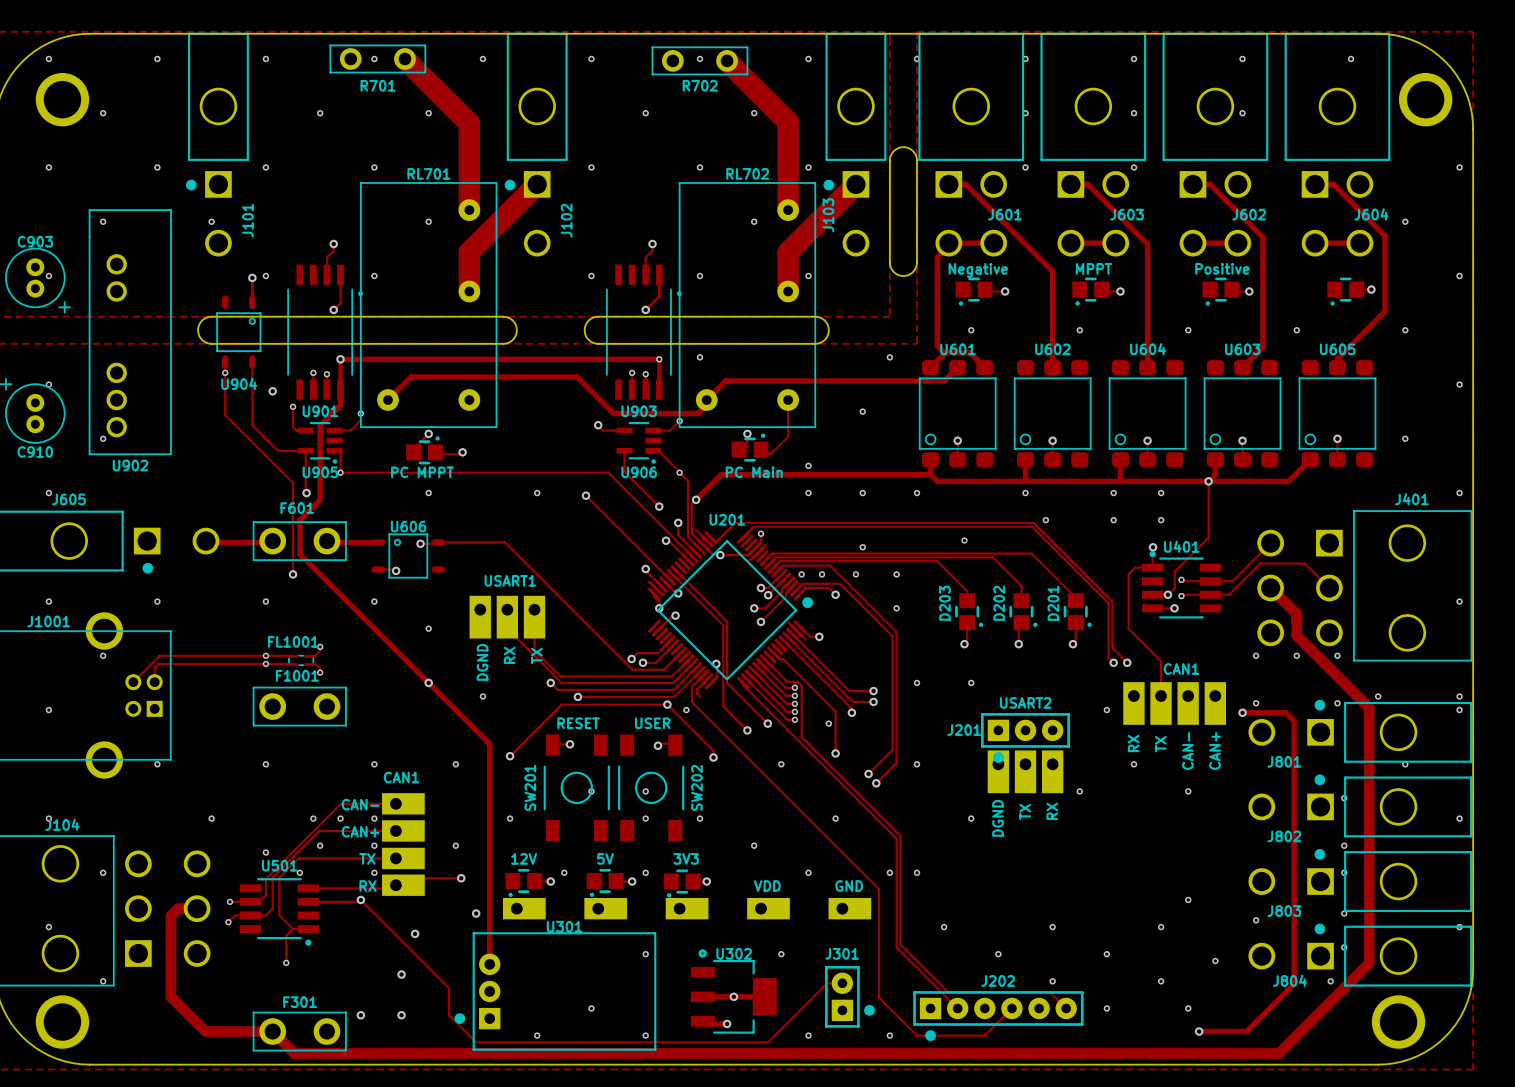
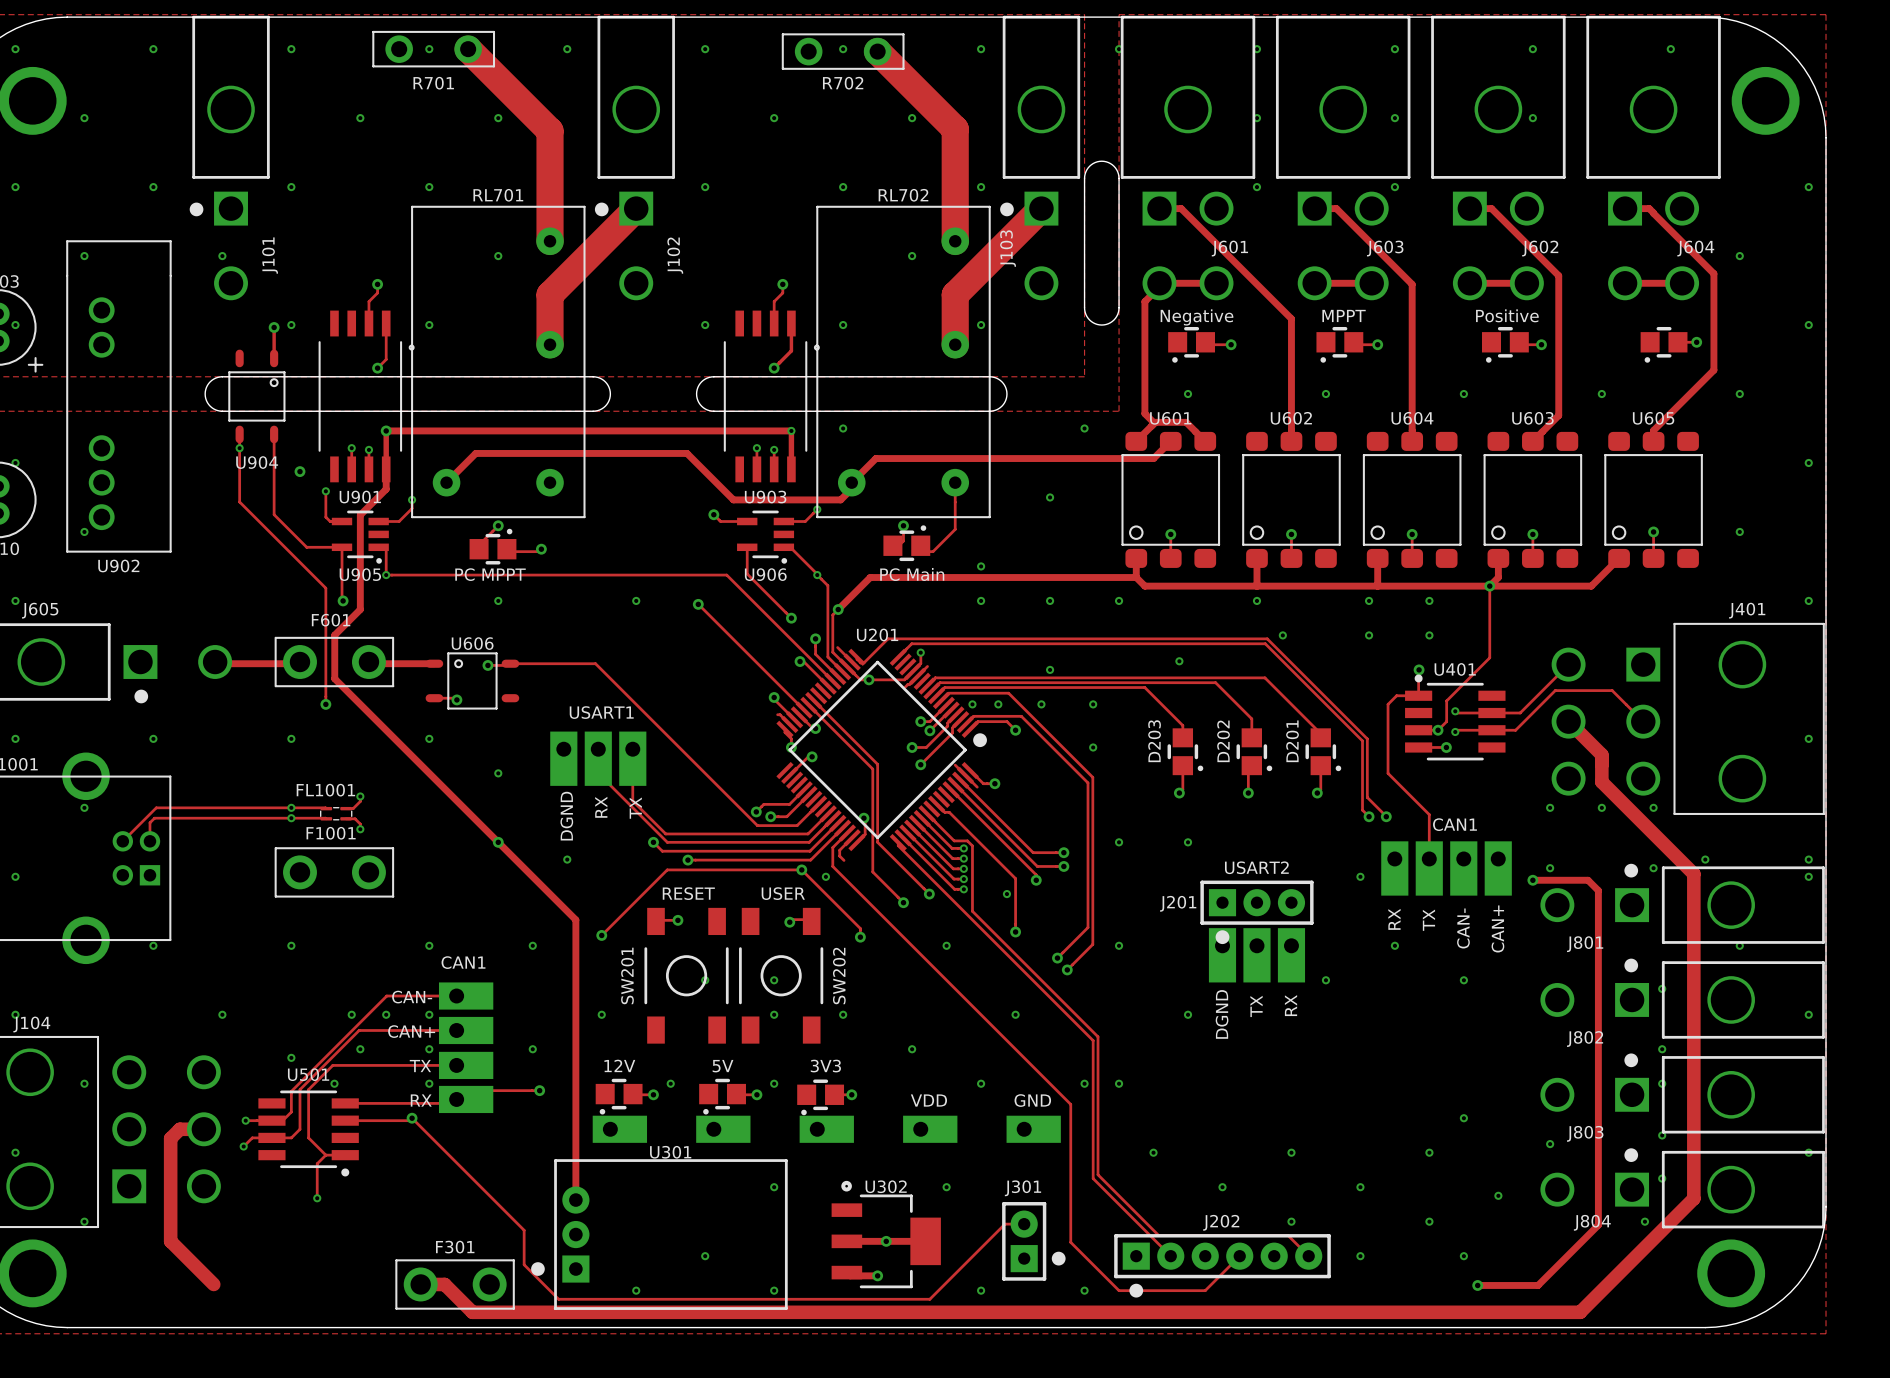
via: (476, 913) -> none
via: (415, 933) -> none
via: (401, 974) -> none
via: (360, 1015) -> none
via: (401, 1015) -> none
track: (204, 1030) (272, 1031) (294, 1053) (1279, 1052) -> (420, 1284) (444, 1284) (472, 1312) (1580, 1312)
F301 position: (299, 1031) -> (455, 1284)

